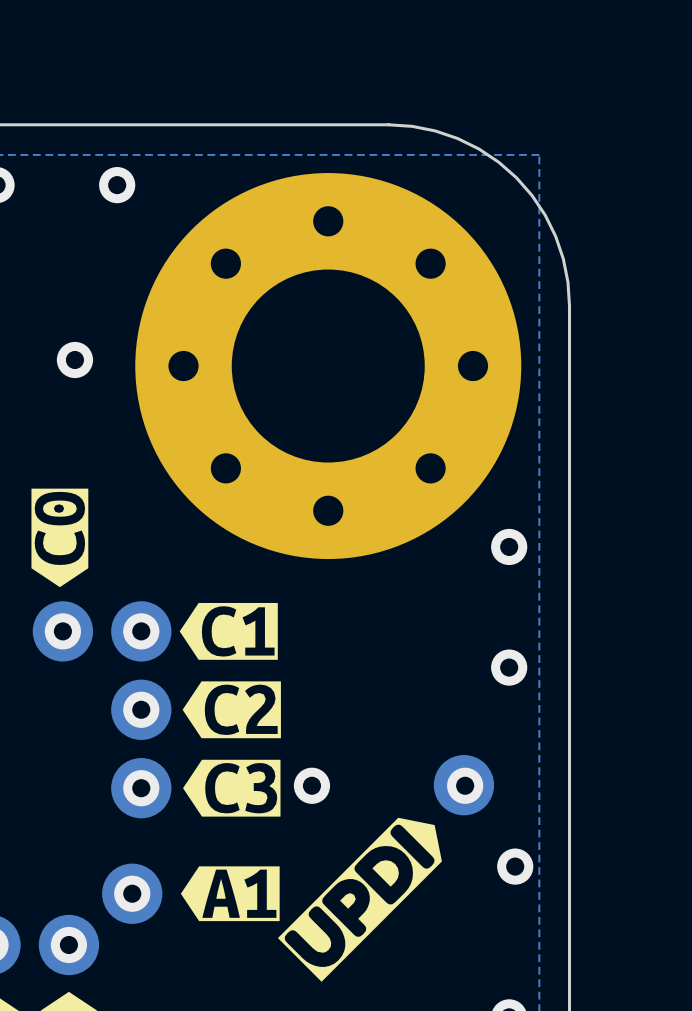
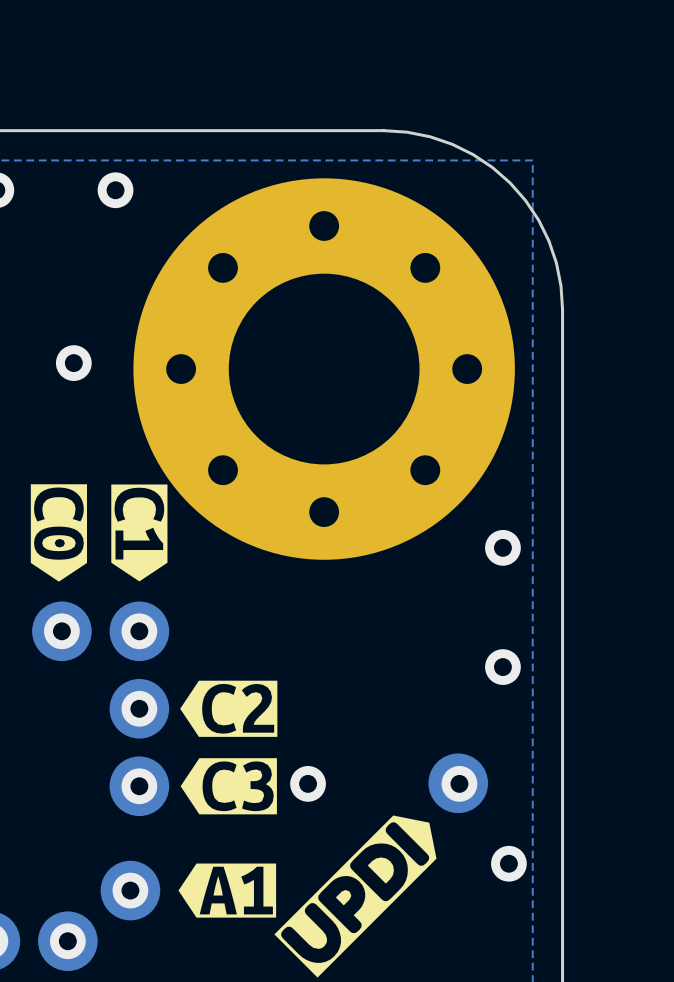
drawing: none -> [111, 484, 168, 582]
drawing shape: [31, 488, 89, 588] -> [30, 484, 88, 582]
drawing: [179, 602, 278, 660] -> none

